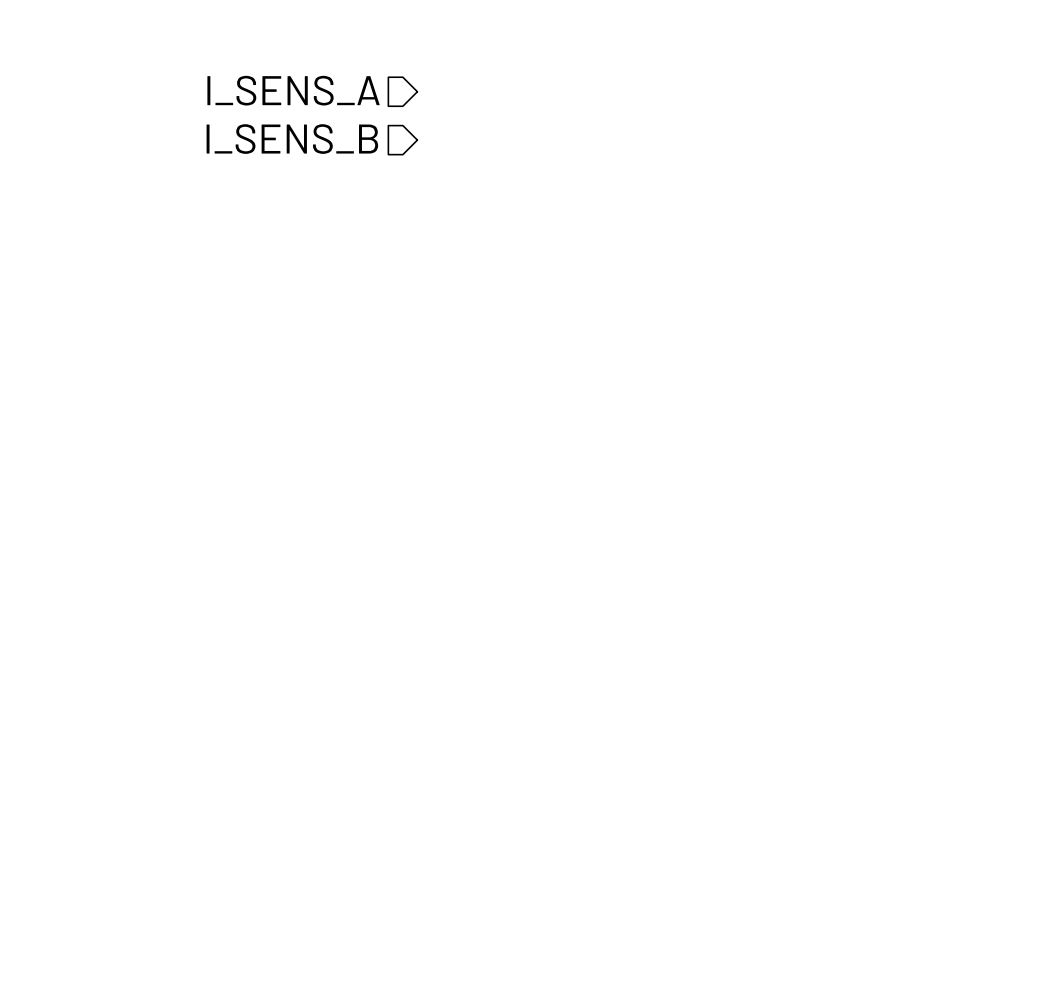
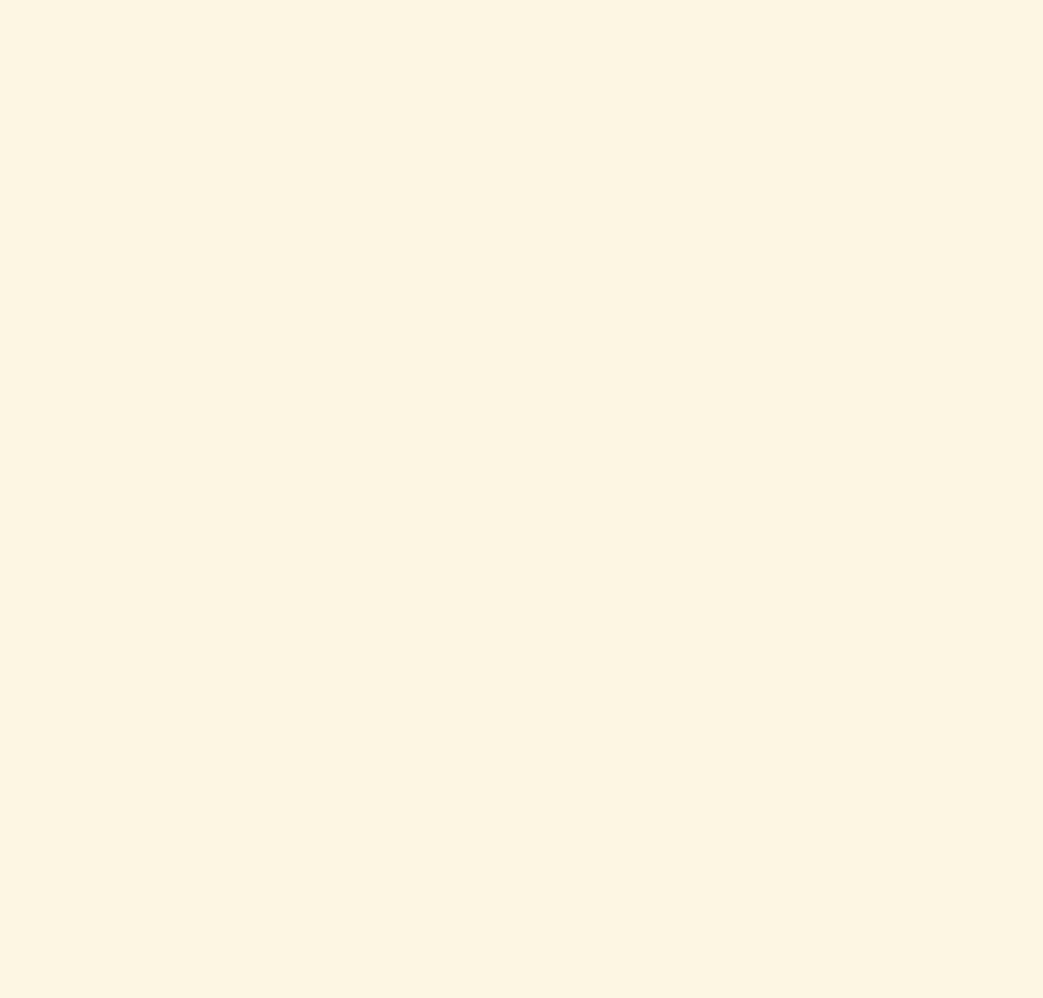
hierarchical label: I_SENS_A (293, 90) -> none
hierarchical label: I_SENS_B (292, 139) -> none

